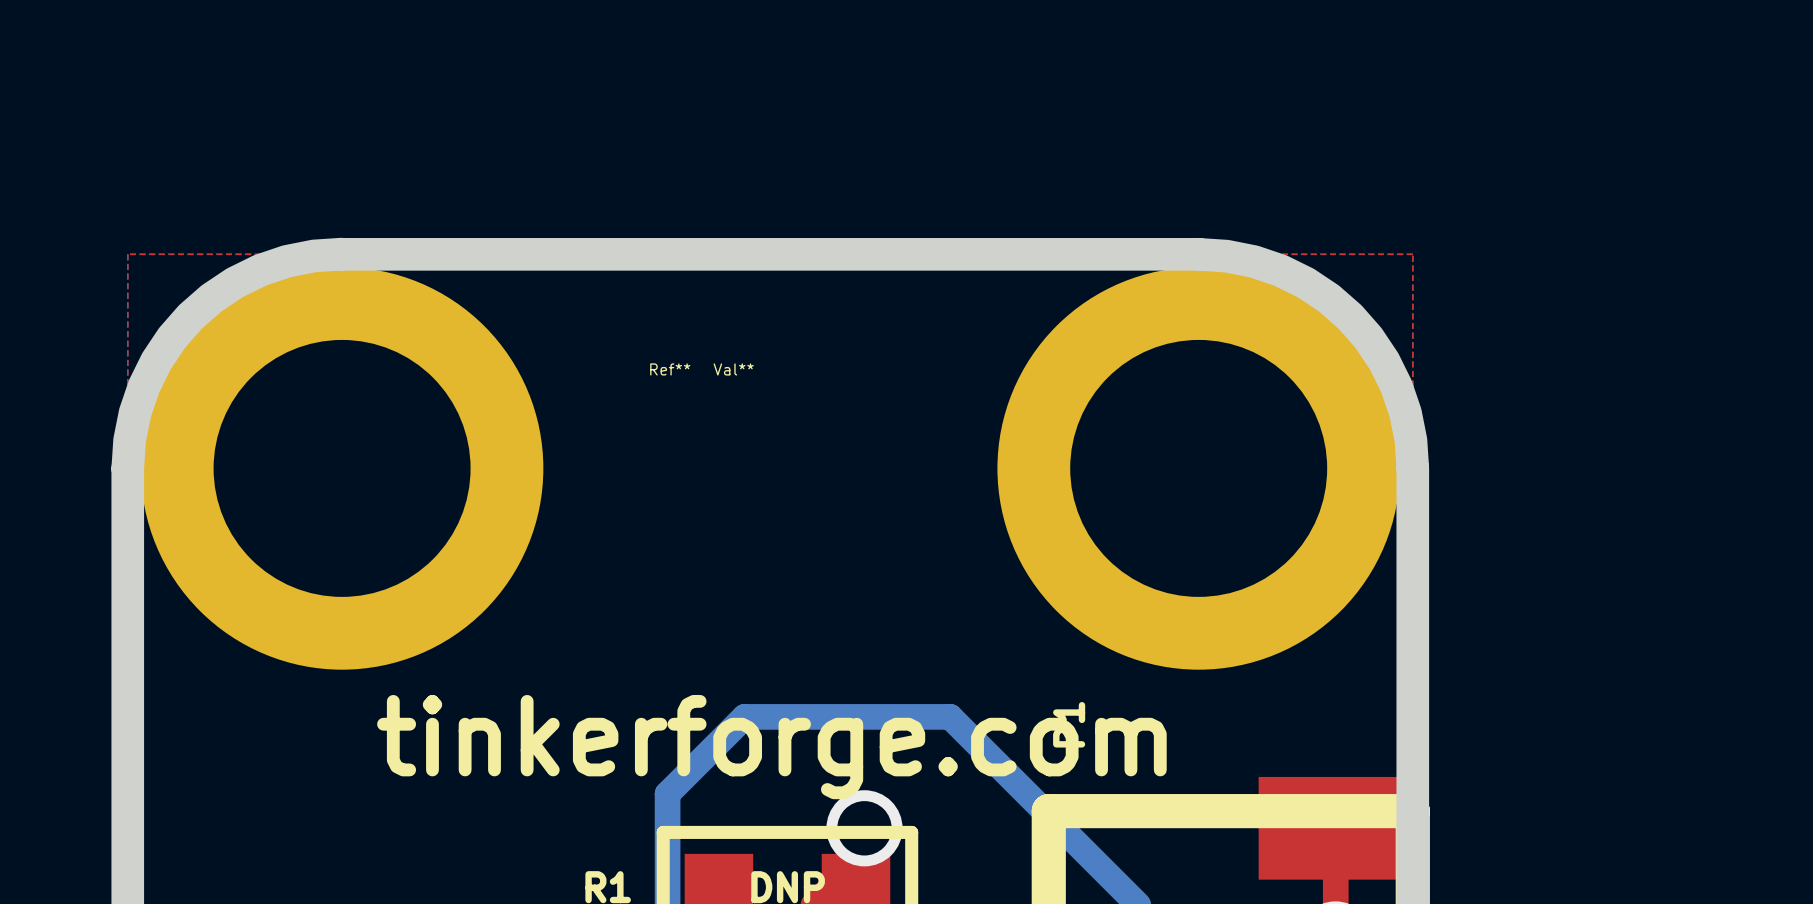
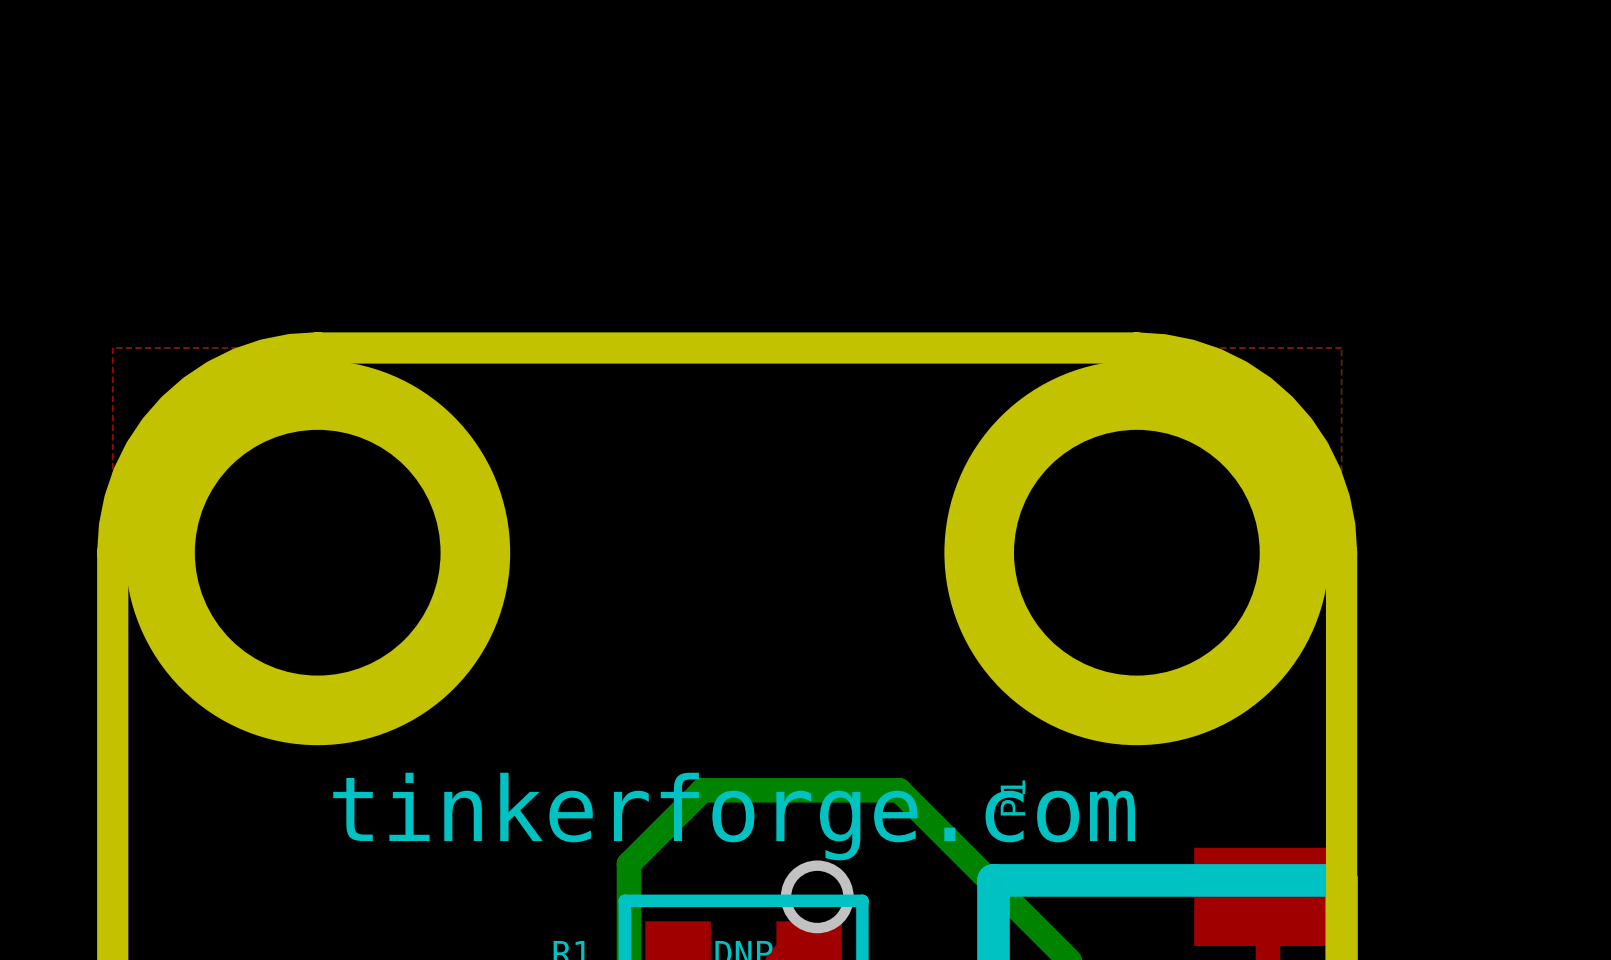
Ref**: Val** (701, 369) -> none

